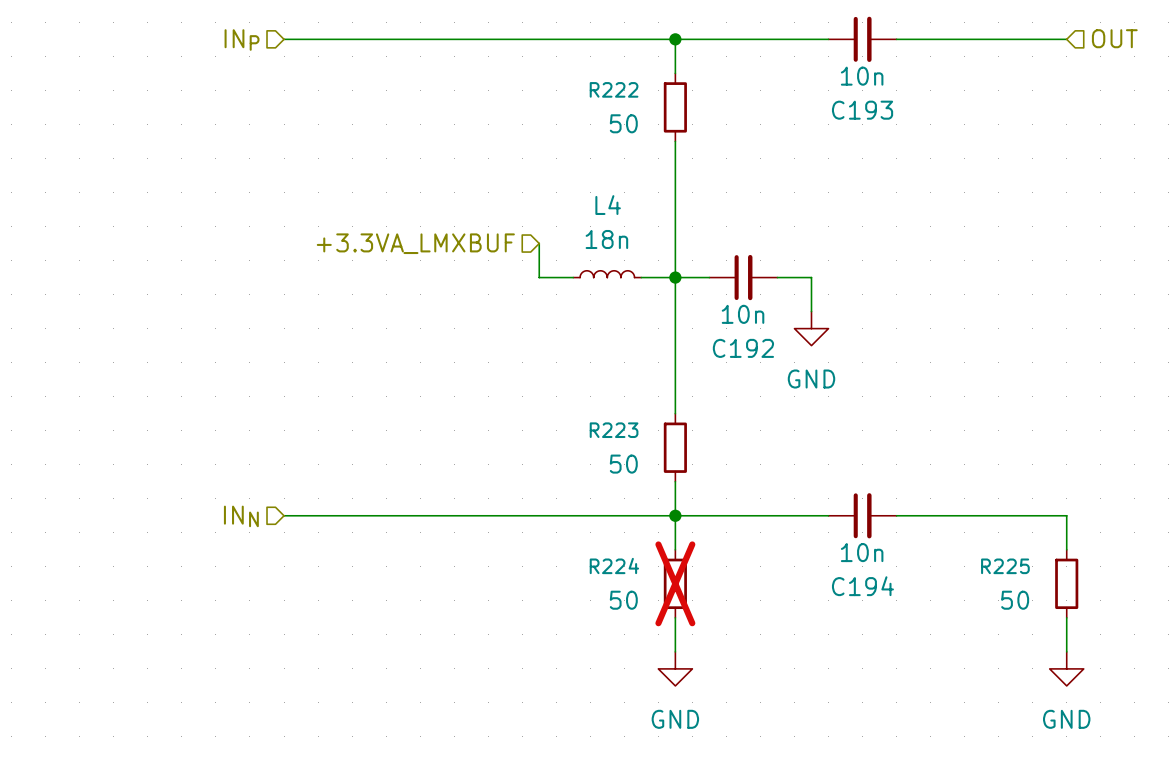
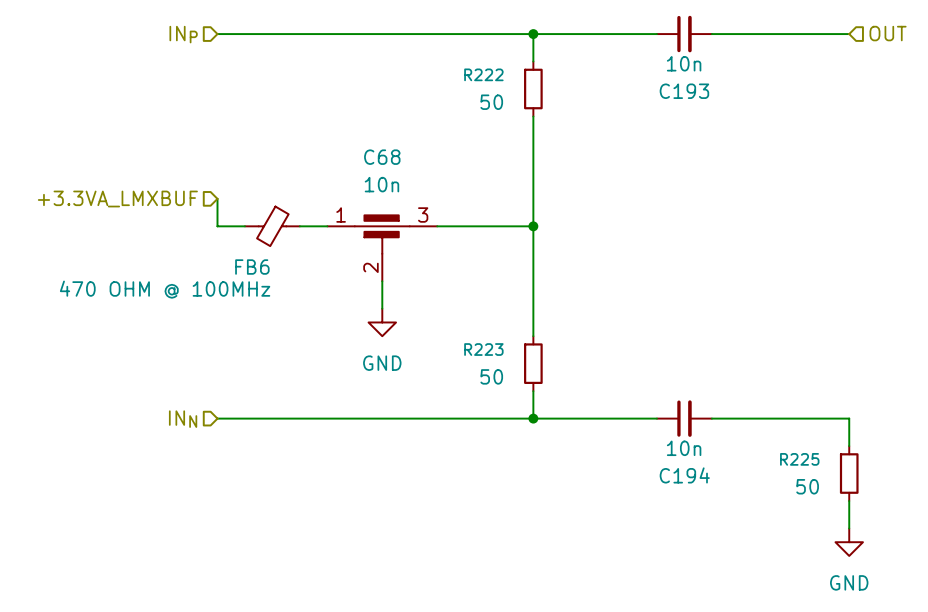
wire: none -> (217, 198) (217, 226) (244, 226)
hierarchical label position: +3.3VA_LMXBUF (415, 243) -> +3.3VA_LMXBUF (117, 199)
wire: (539, 243) (539, 277) (556, 277) -> none
L4: 18n (607, 274) -> none
FB6: none -> 470 OHM @ 100MHz (272, 226)
wire: none -> (450, 226) (505, 226)
wire: (675, 277) (709, 277) -> (299, 226) (327, 226)
C192: 10n (743, 277) -> none
wire: (777, 277) (811, 277) (811, 311) -> none
C68: none -> 10n (382, 248)
power symbol: GND (811, 328) -> none
power symbol: none -> GND (382, 322)
wire: (675, 515) (675, 549) -> (382, 281) (382, 308)
R224: 50 (675, 583) -> none
wire: (675, 617) (675, 651) -> none
power symbol: GND (675, 668) -> none

